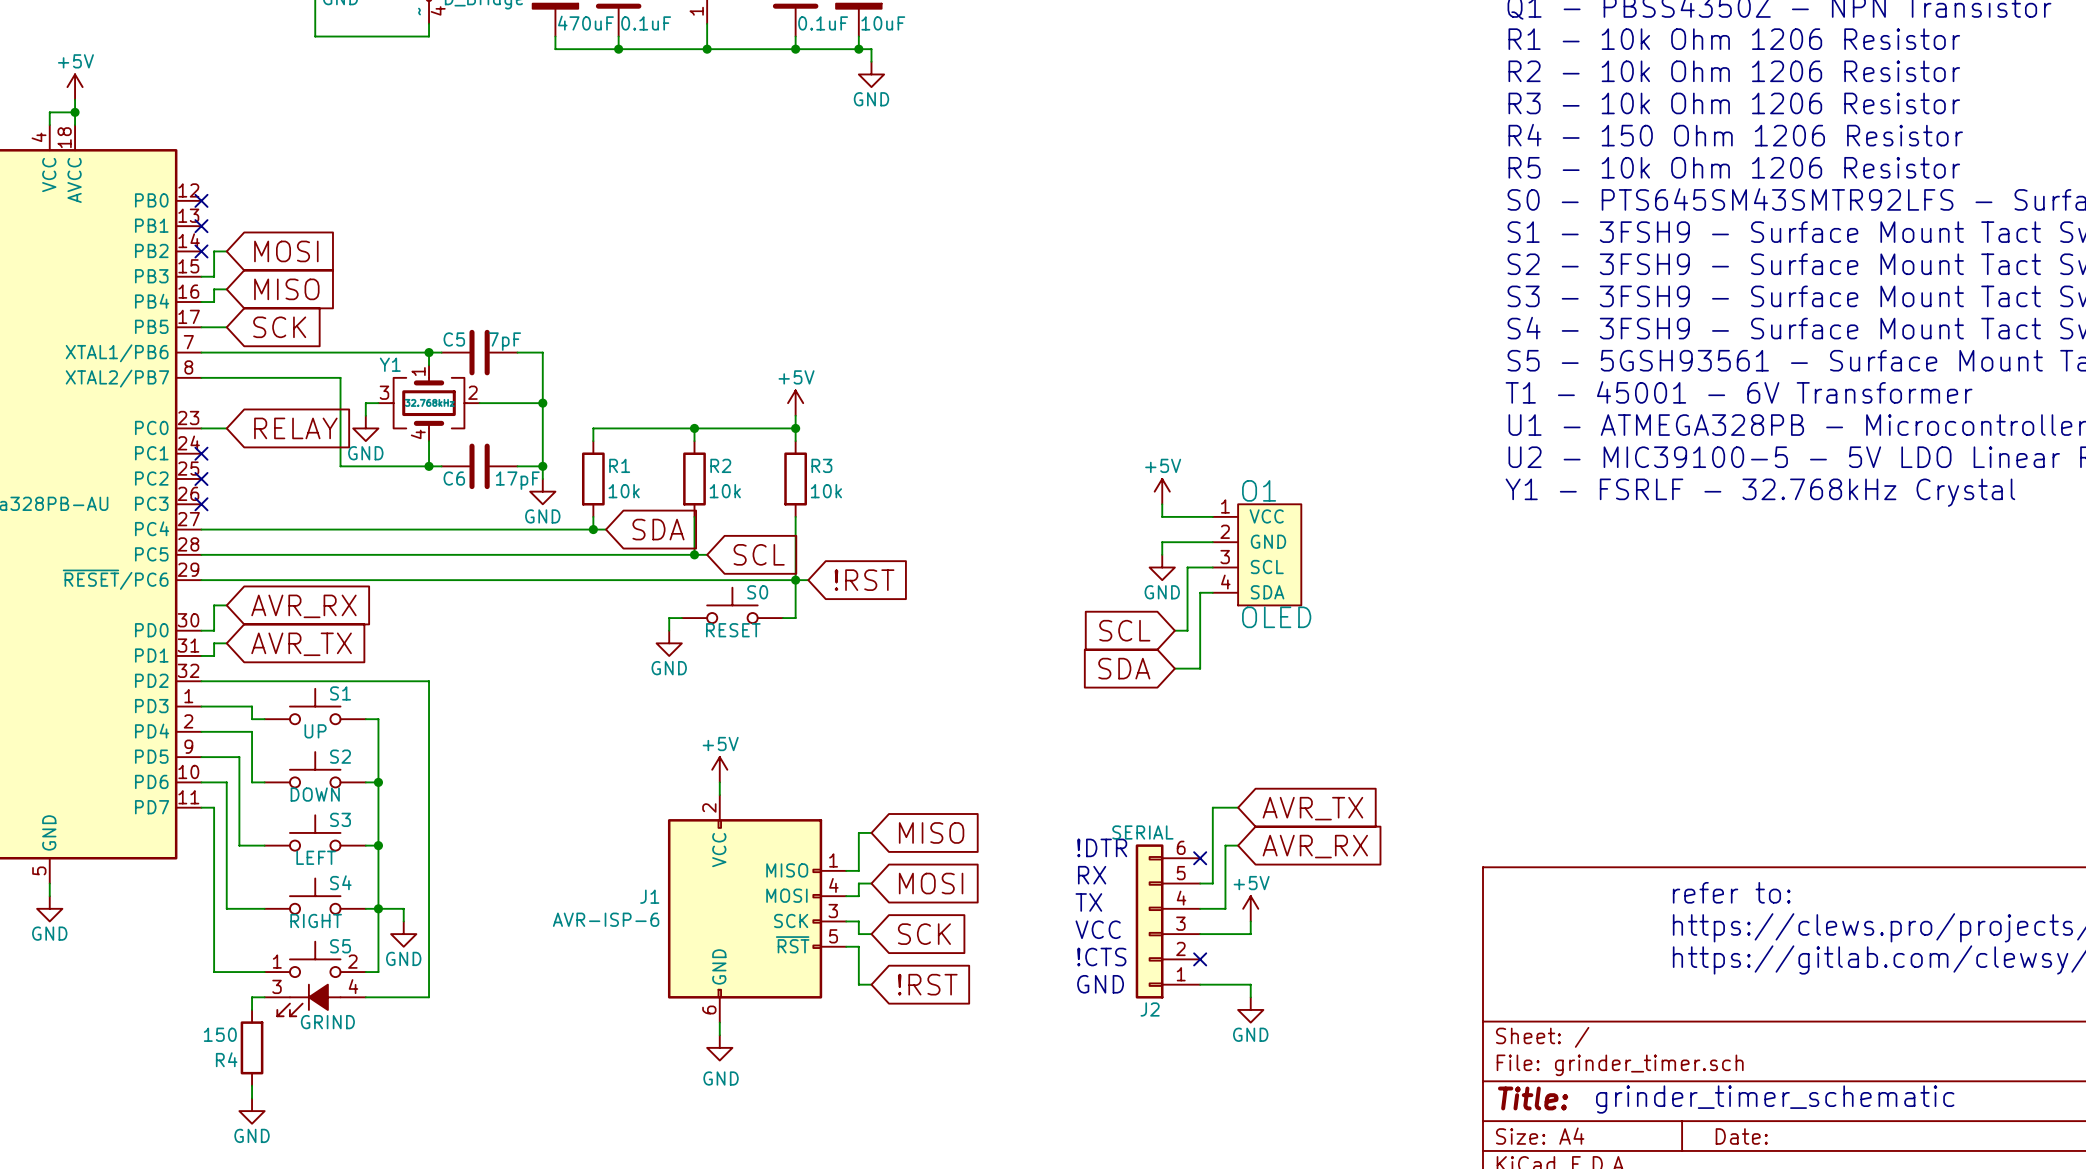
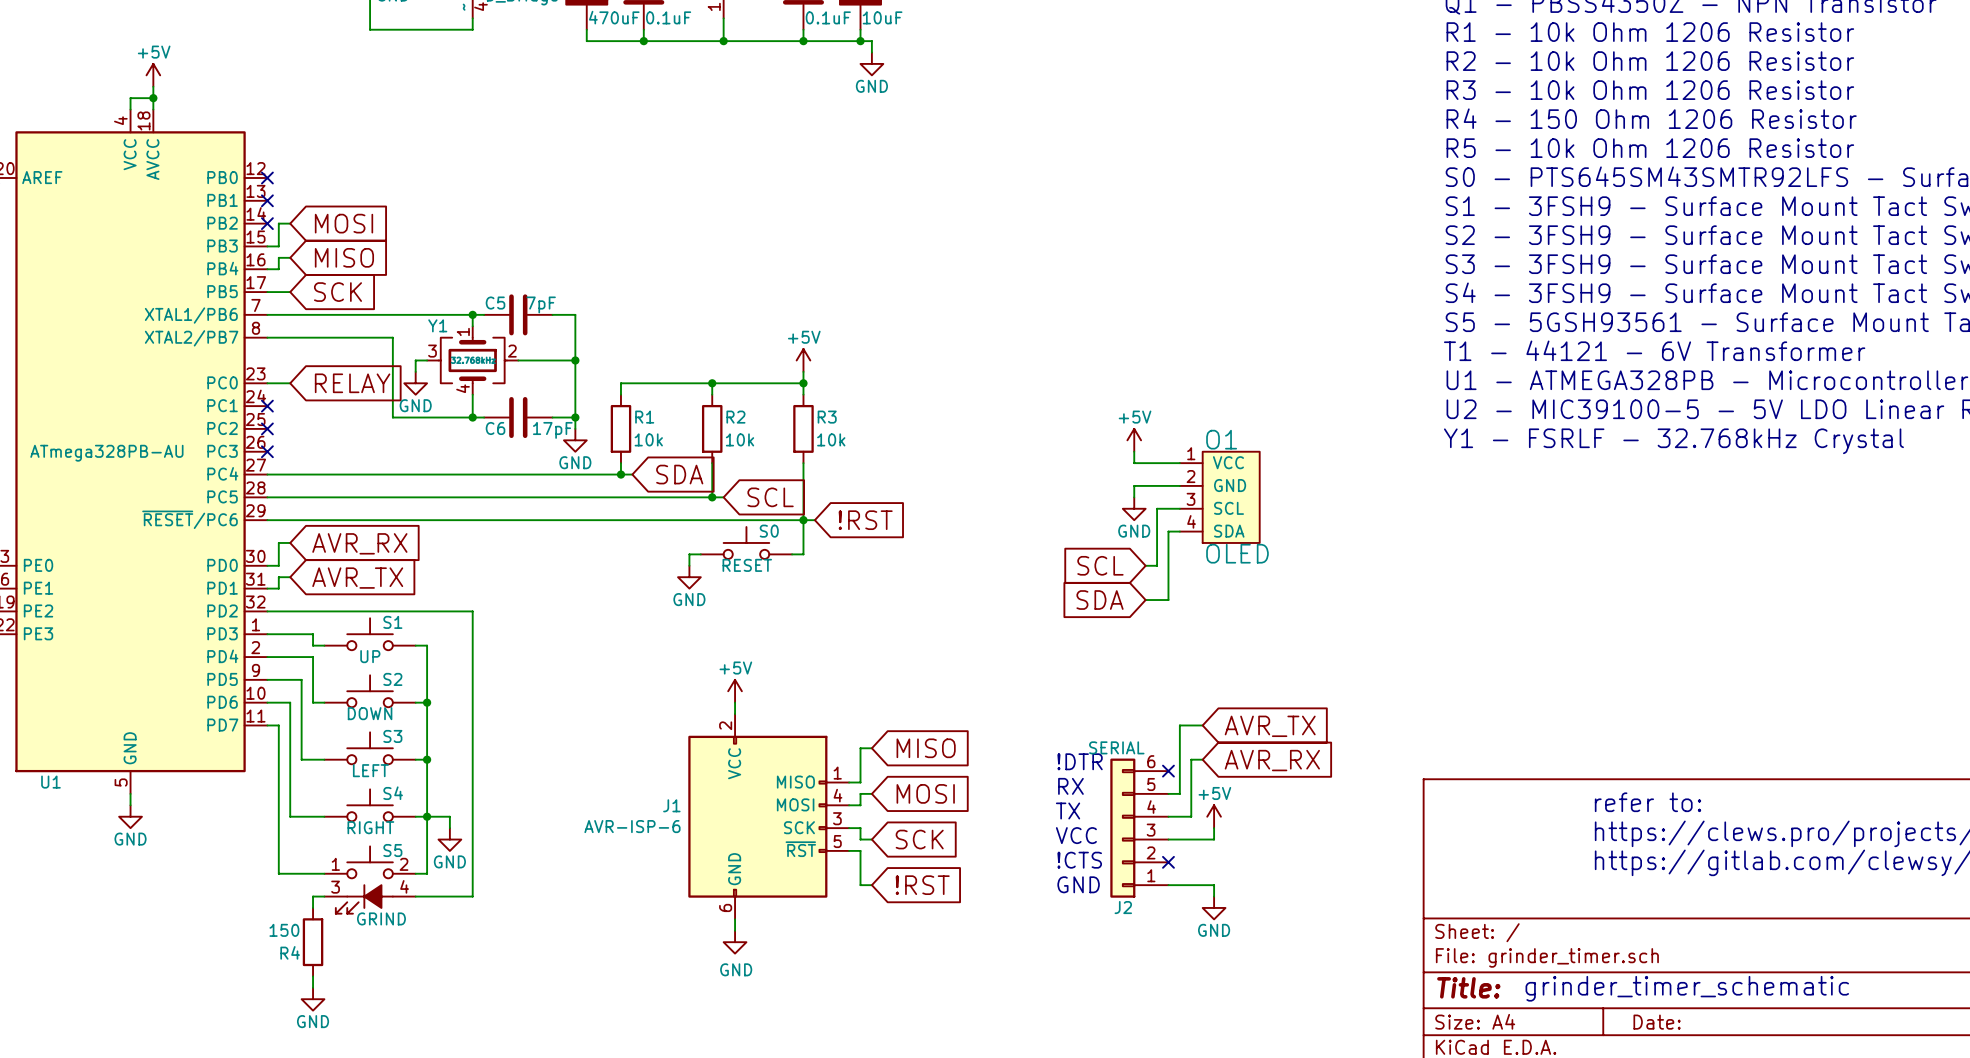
text: T1 - 45001 - 6V Transformer (1739, 392) -> T1 - 44121 - 6V Transformer (1654, 350)

